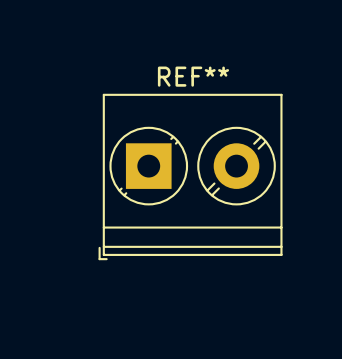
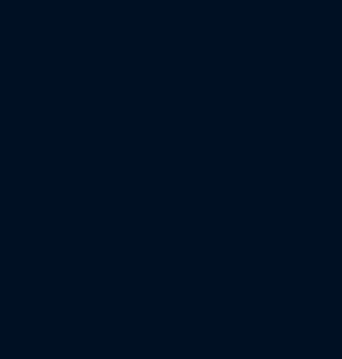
REF**: (190, 176) -> none

